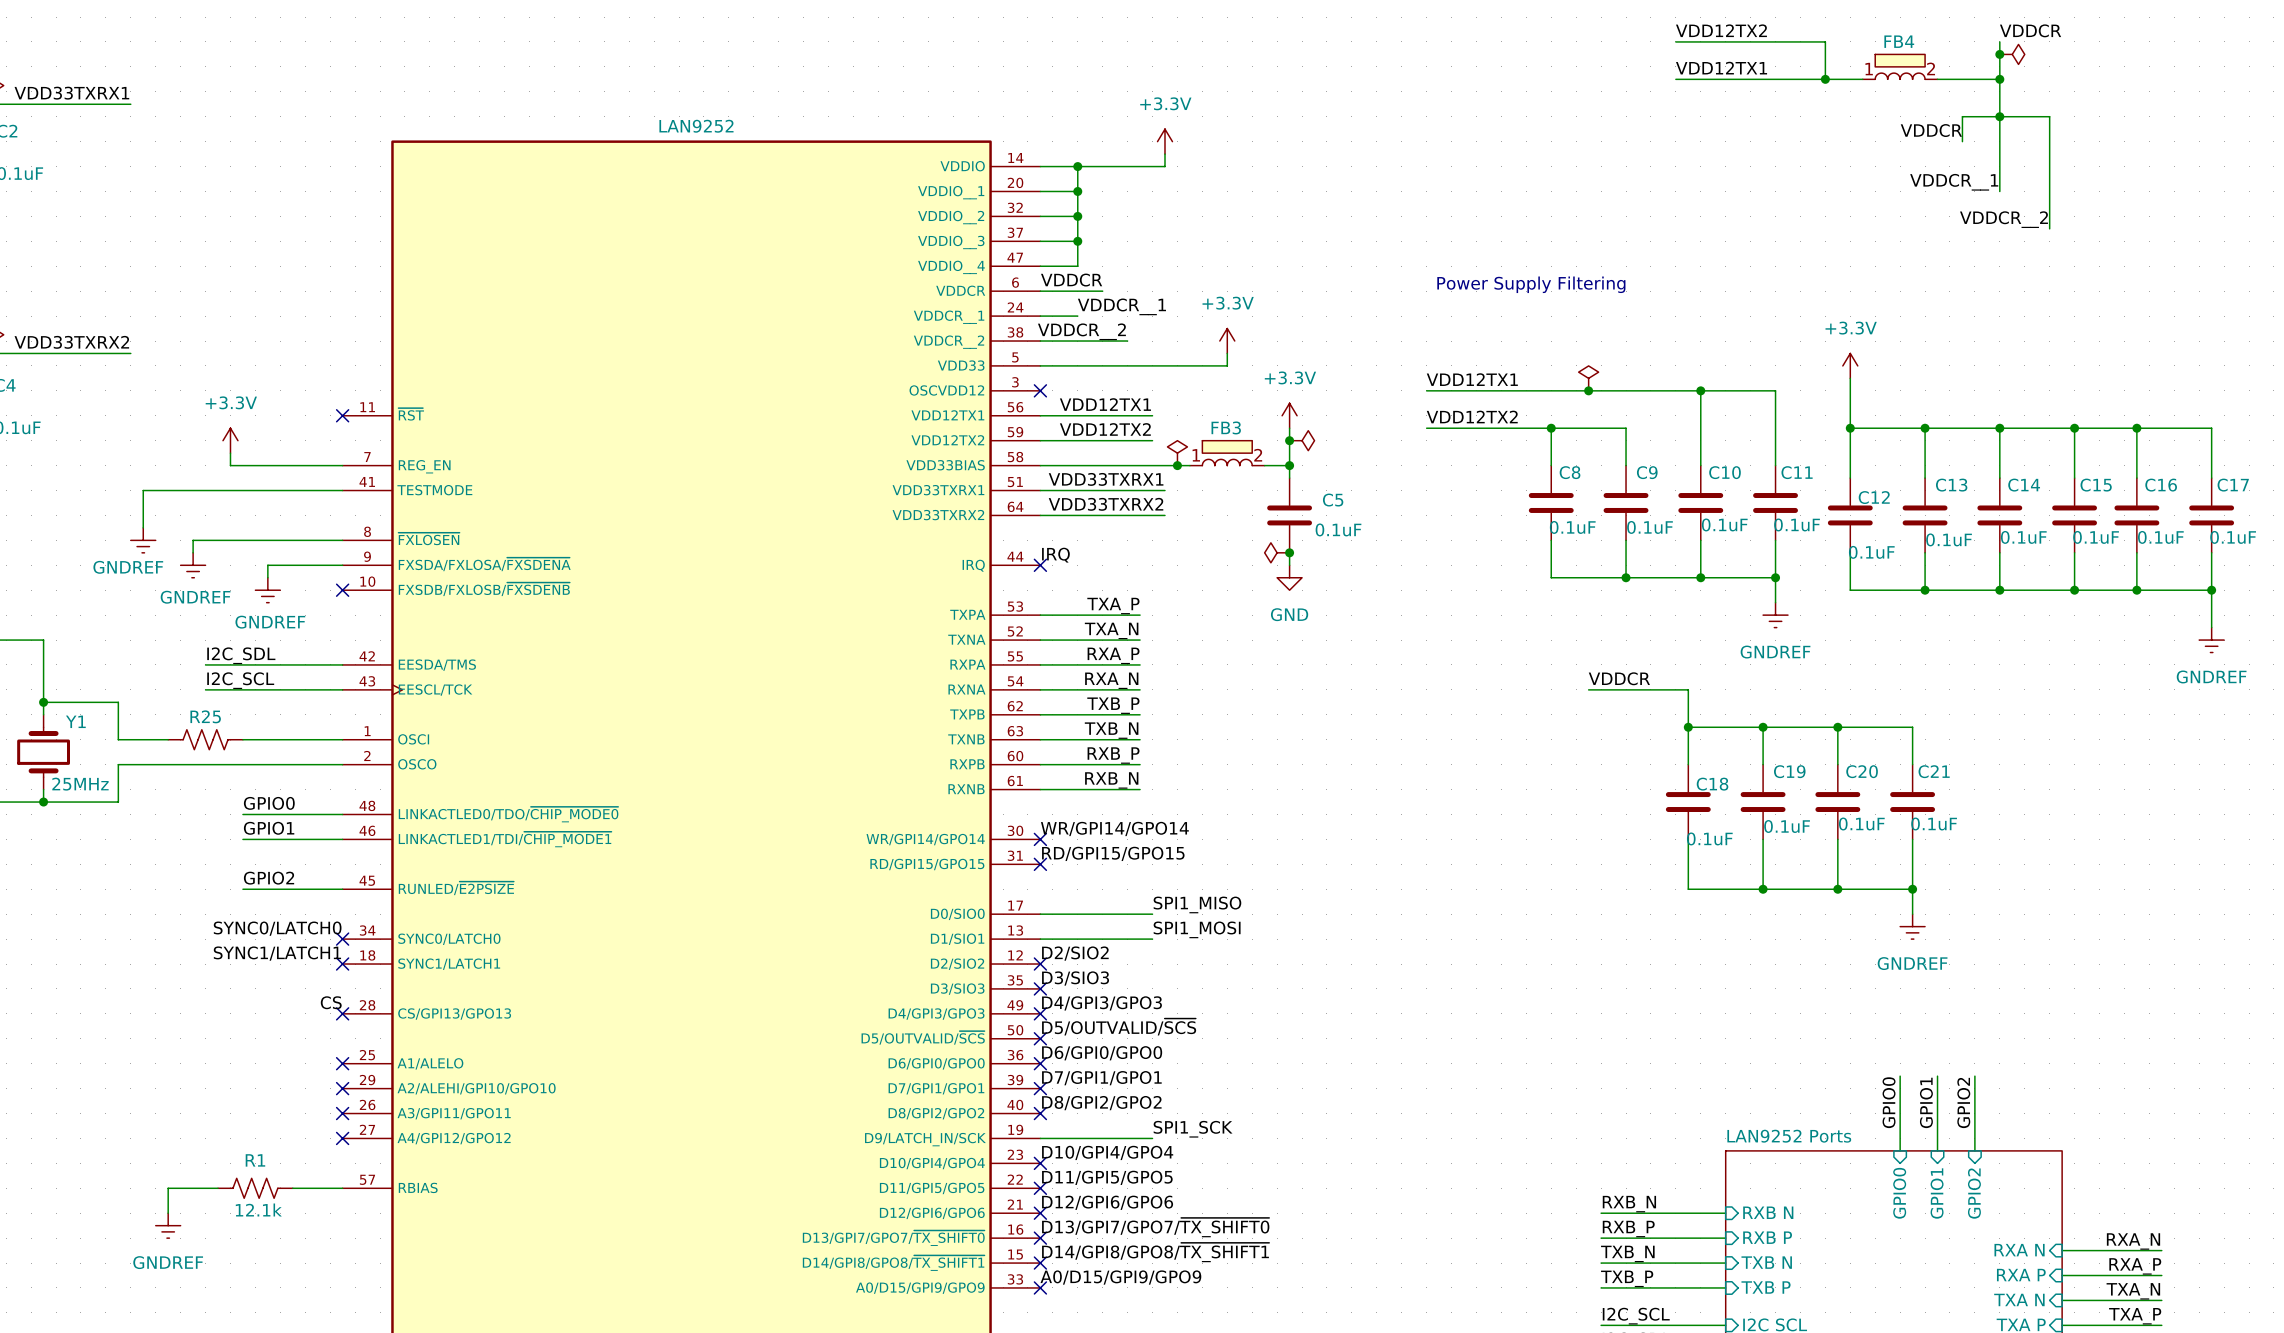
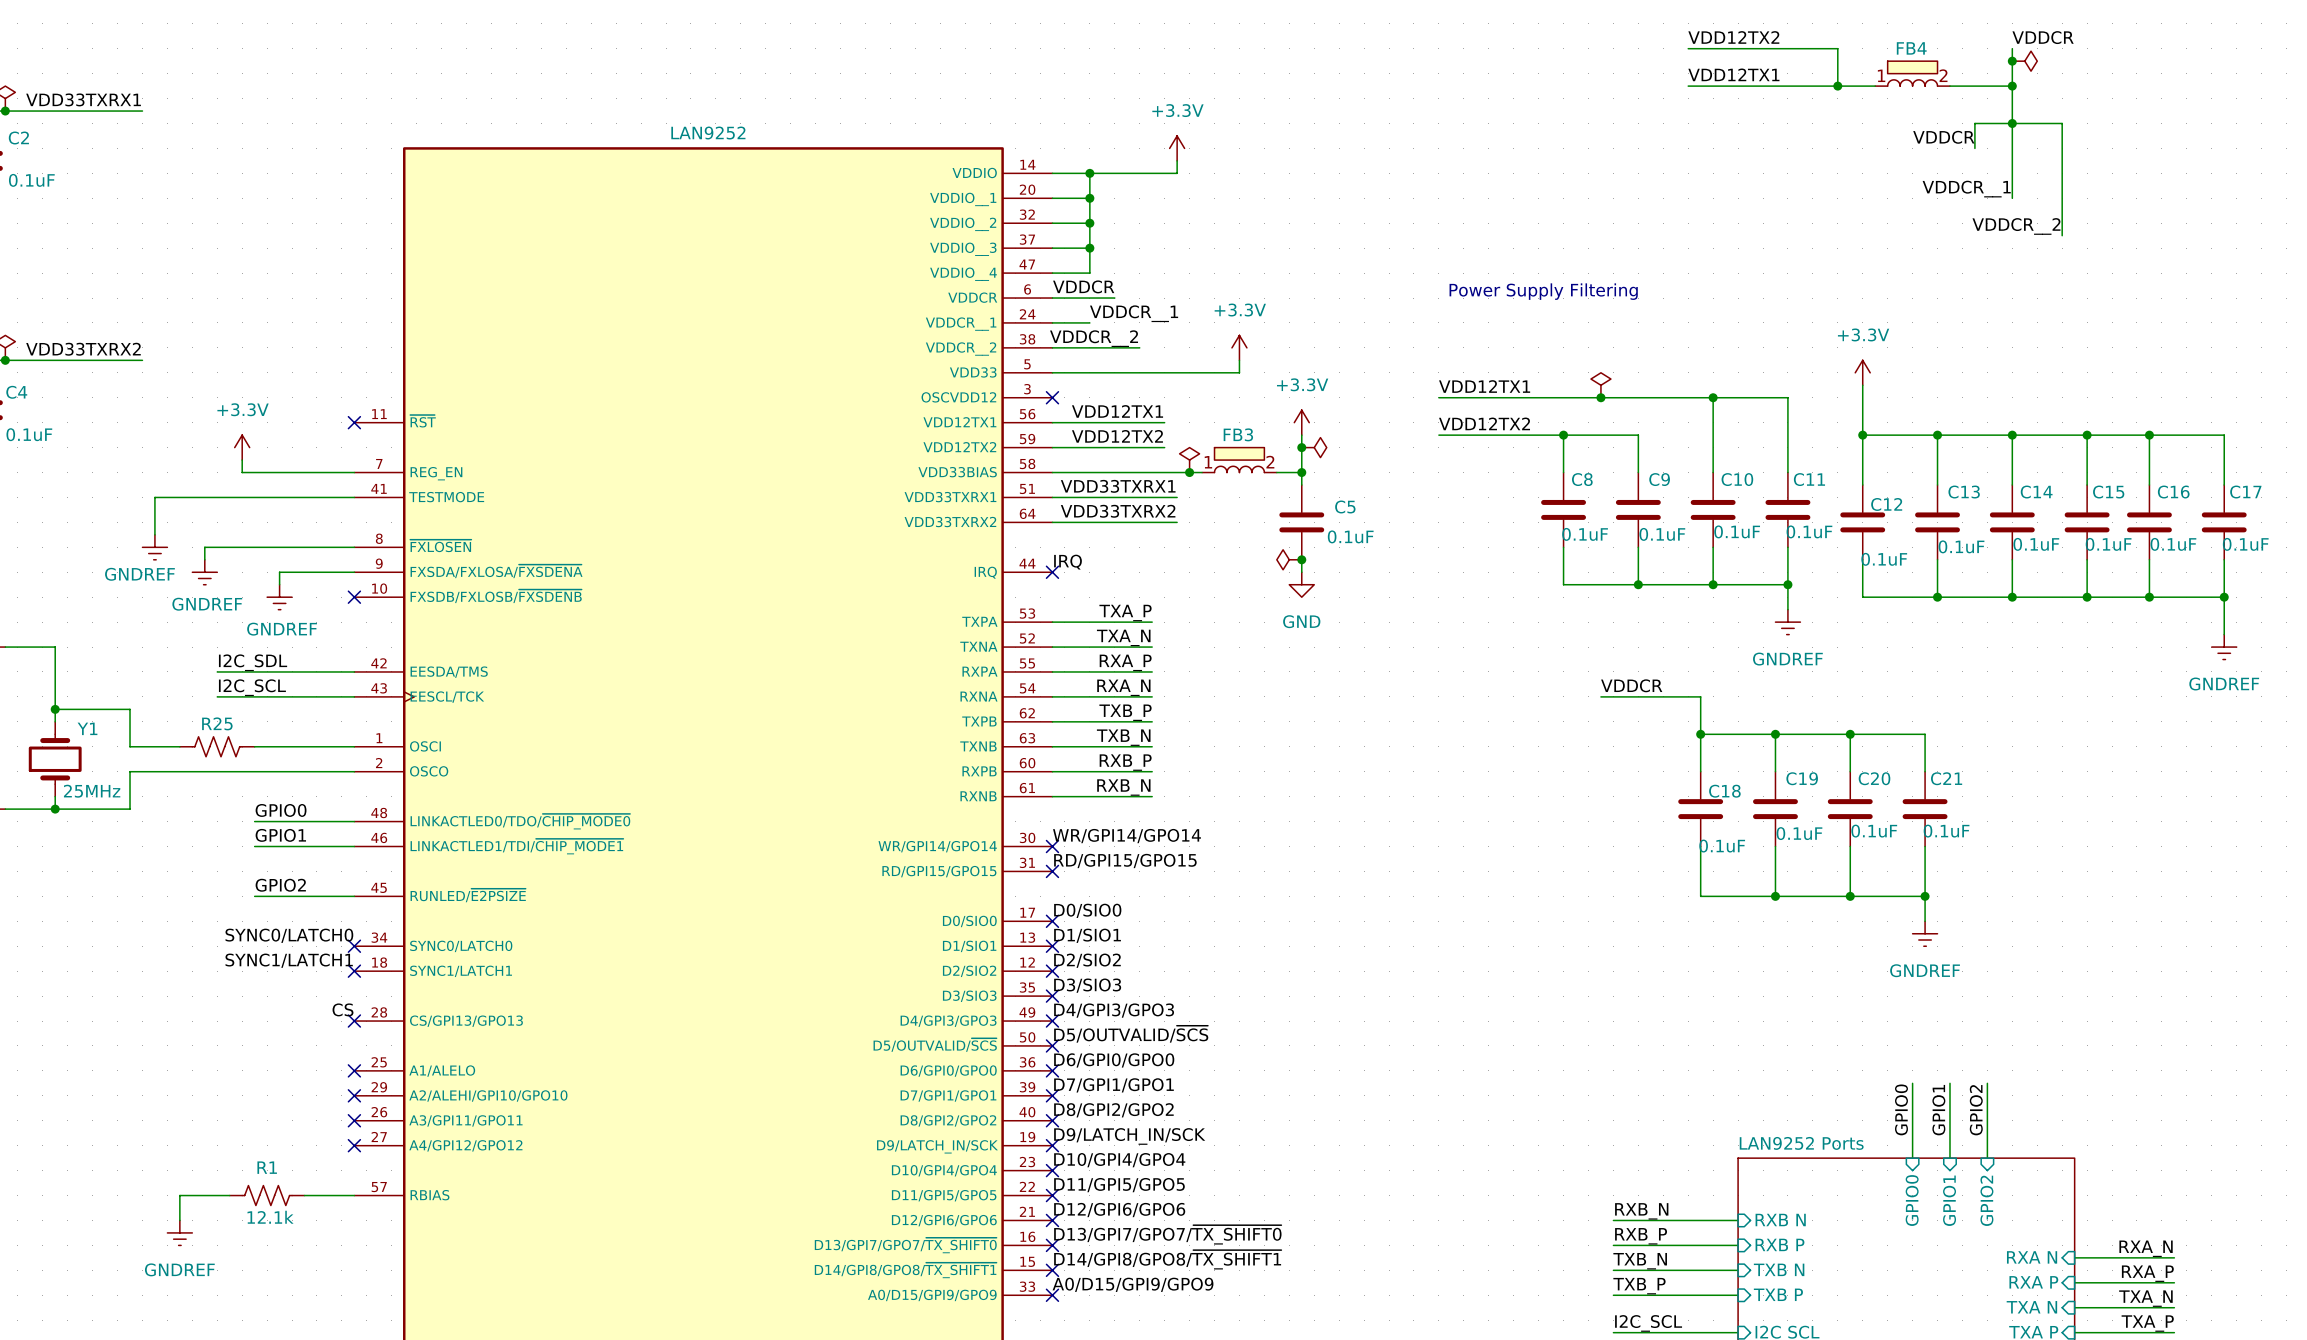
label: none -> D0/SIO0 (1087, 910)
label: SPI1_MISO (1197, 904) -> none
wire: (1040, 914) (1152, 914) -> none
no-connect mark: none -> (1052, 921)
label: none -> D1/SIO1 (1087, 935)
label: SPI1_MOSI (1197, 929) -> none
wire: (1040, 939) (1152, 939) -> none
no-connect mark: none -> (1052, 946)
label: none -> D9/LATCH_IN/SCK (1129, 1136)
label: SPI1_SCK (1193, 1129) -> none
wire: (1040, 1138) (1152, 1138) -> none
no-connect mark: none -> (1052, 1145)

